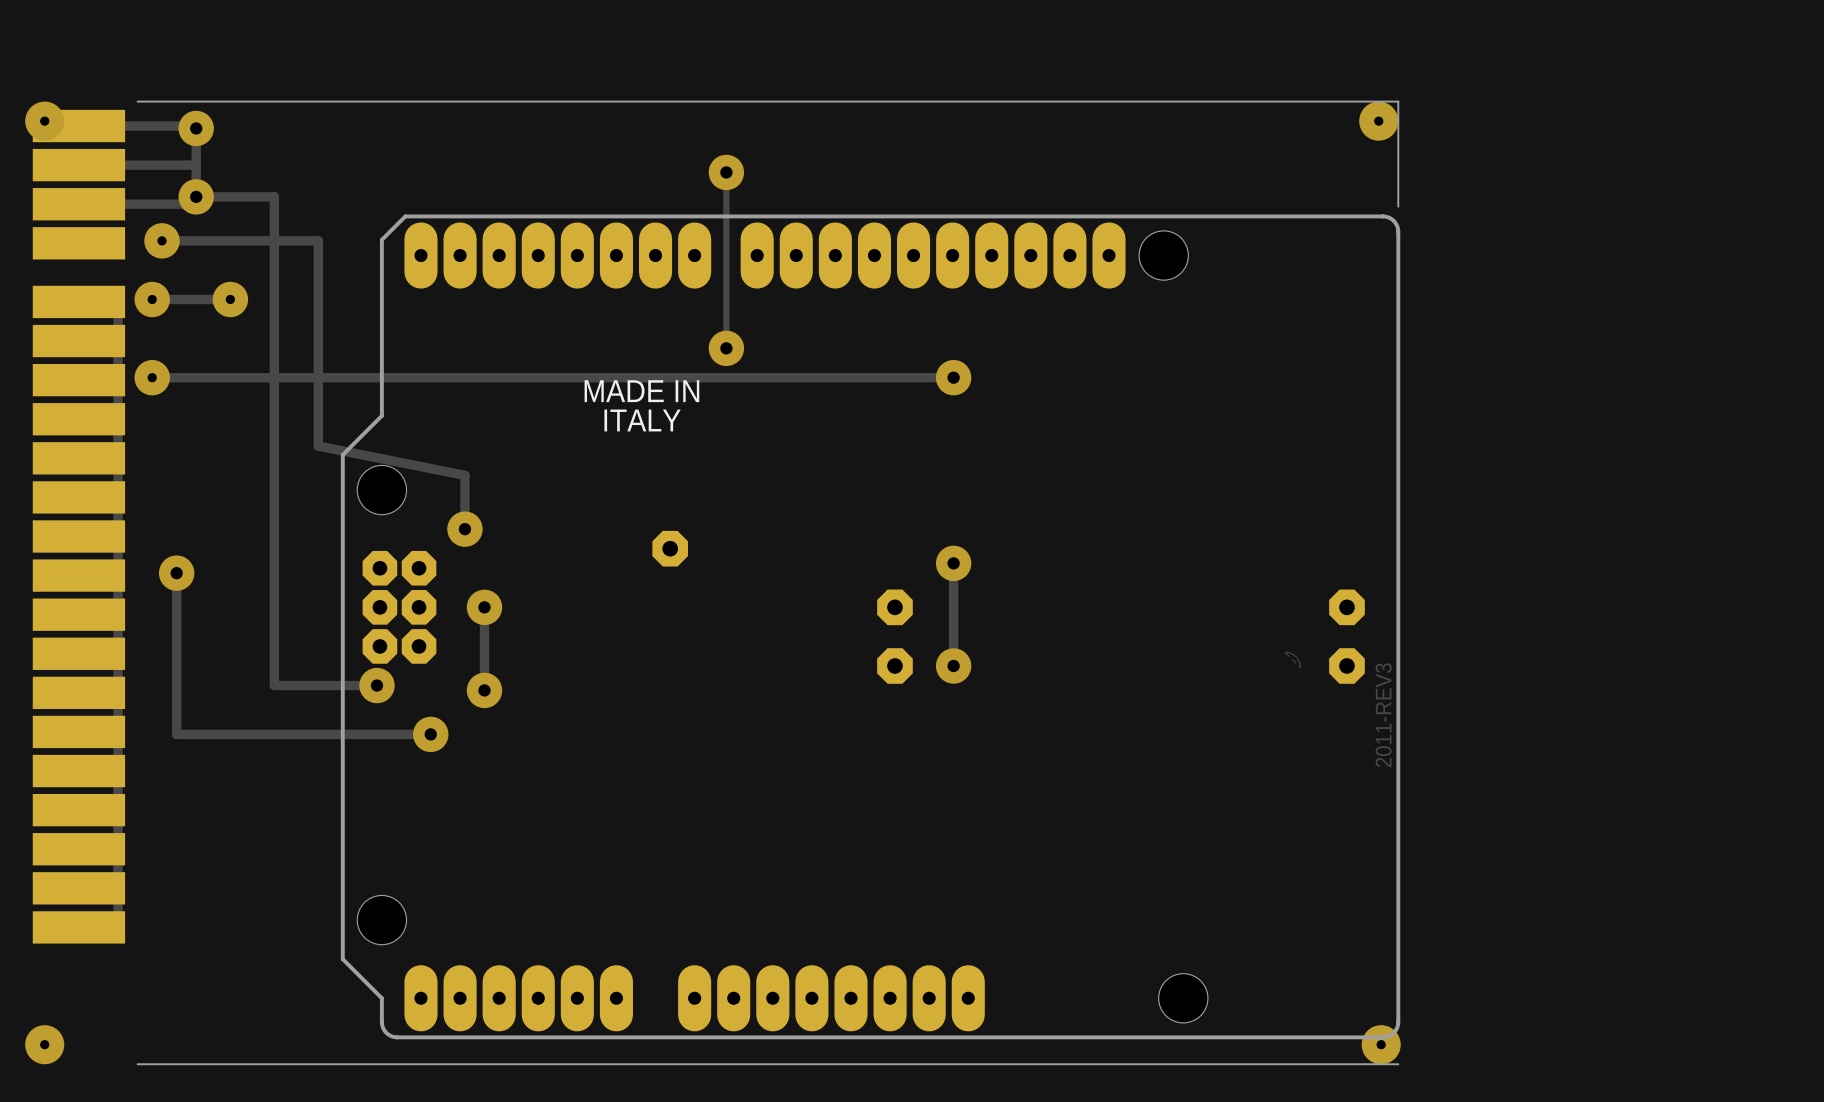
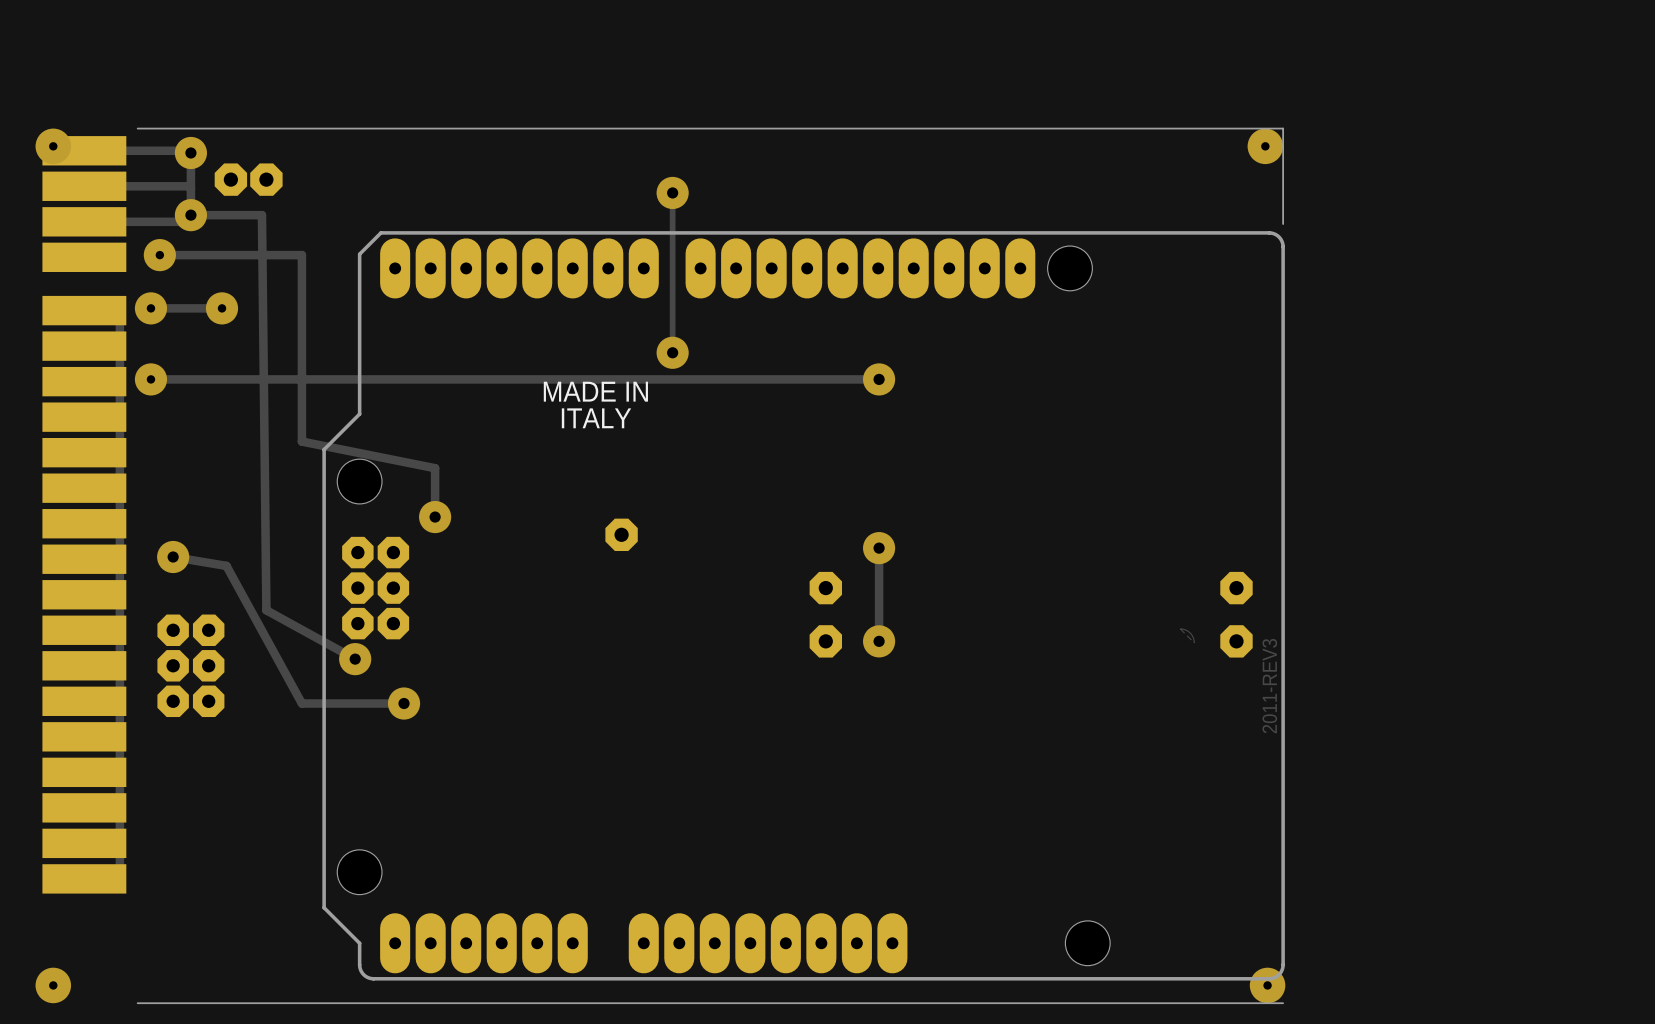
part: none -> (230, 179)
part: none -> (266, 179)
track: (274, 196) (274, 685) (377, 685) -> (261, 215) (266, 610) (355, 659)
track: (176, 573) (176, 734) (318, 734) -> (173, 557) (226, 565) (301, 703)
track: (484, 607) (484, 690) -> none
via: (484, 607) -> none
via: (484, 690) -> none
part: none -> (190, 665)

